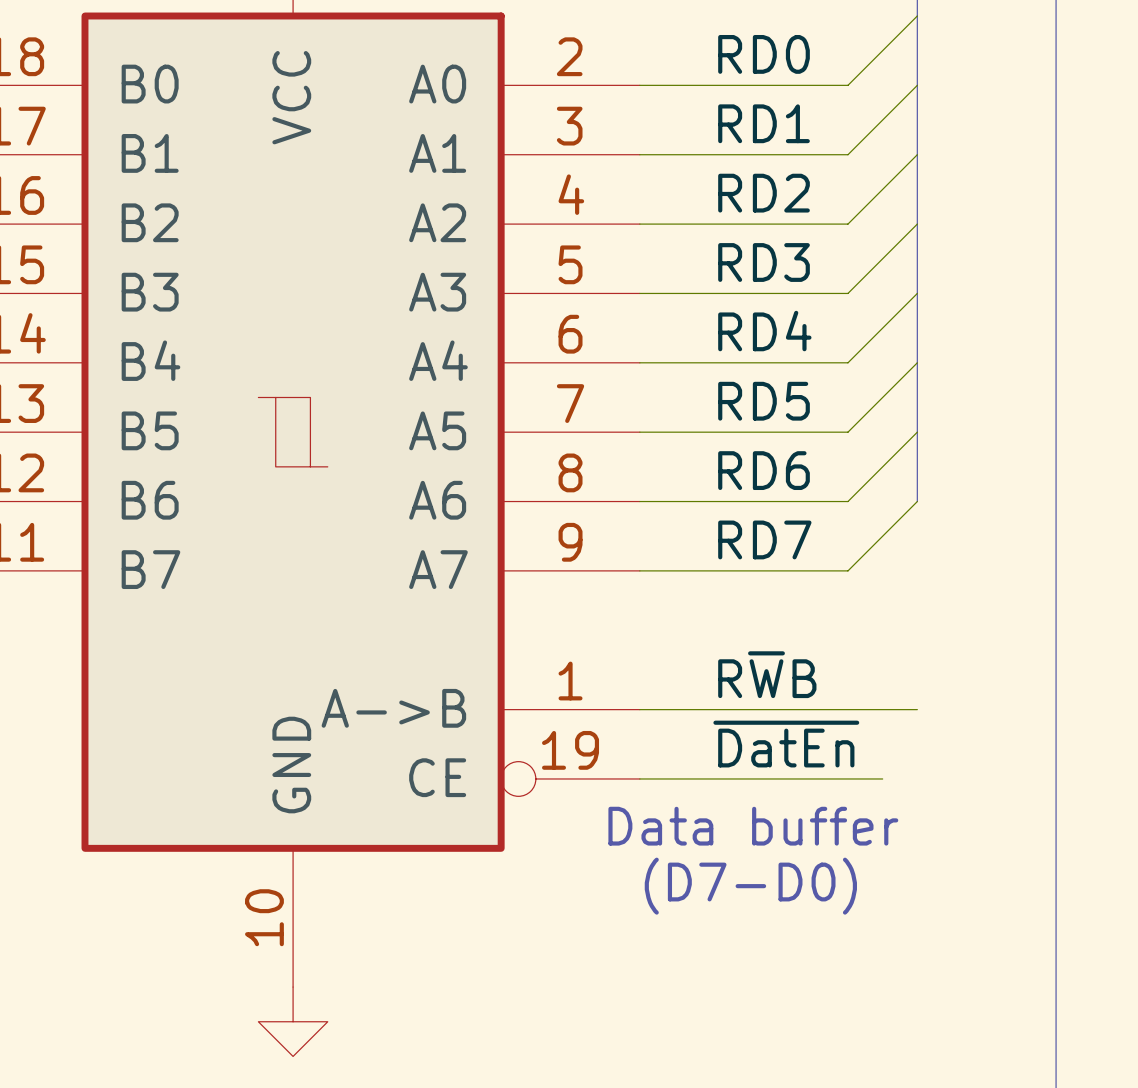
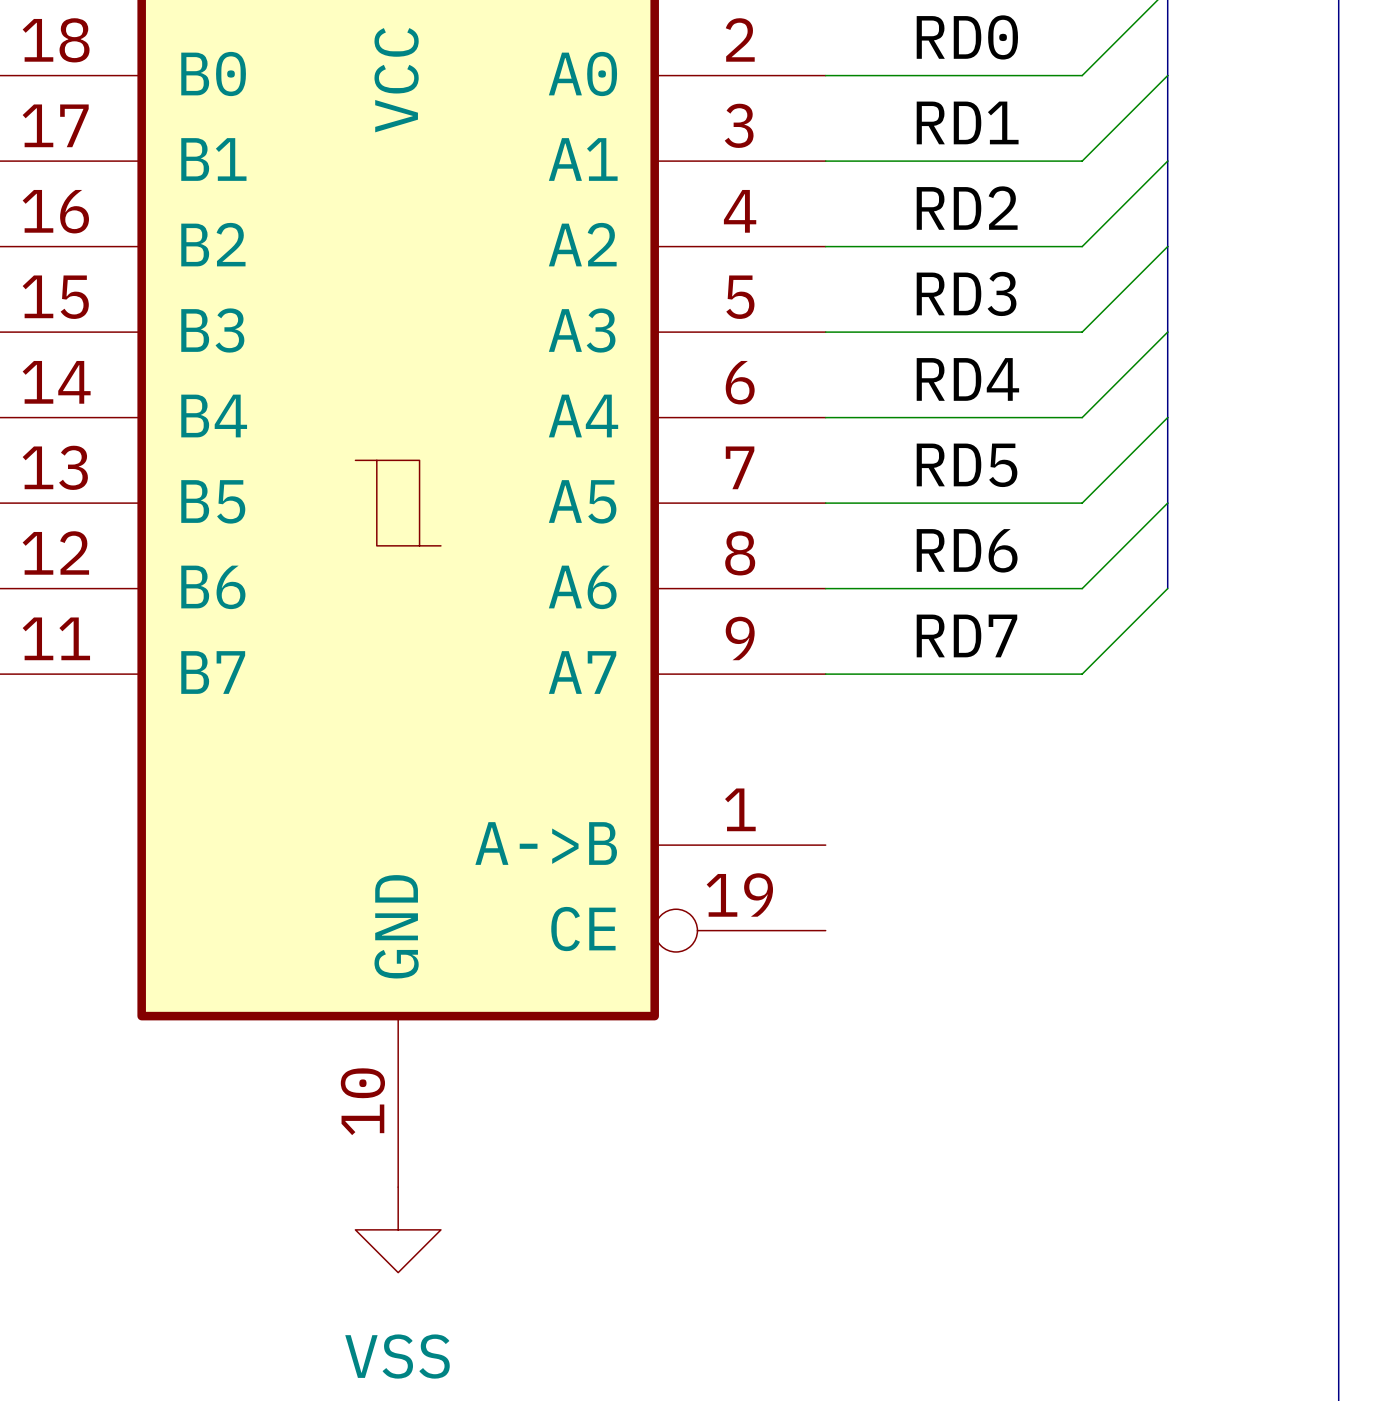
label: R~{W}B (767, 674) -> none
wire: (639, 709) (917, 709) -> none
label: ~{DatEn} (786, 744) -> none
wire: (639, 778) (882, 778) -> none
text: Data buffer (753, 826) -> none
text: (D7-D0) (750, 886) -> none

